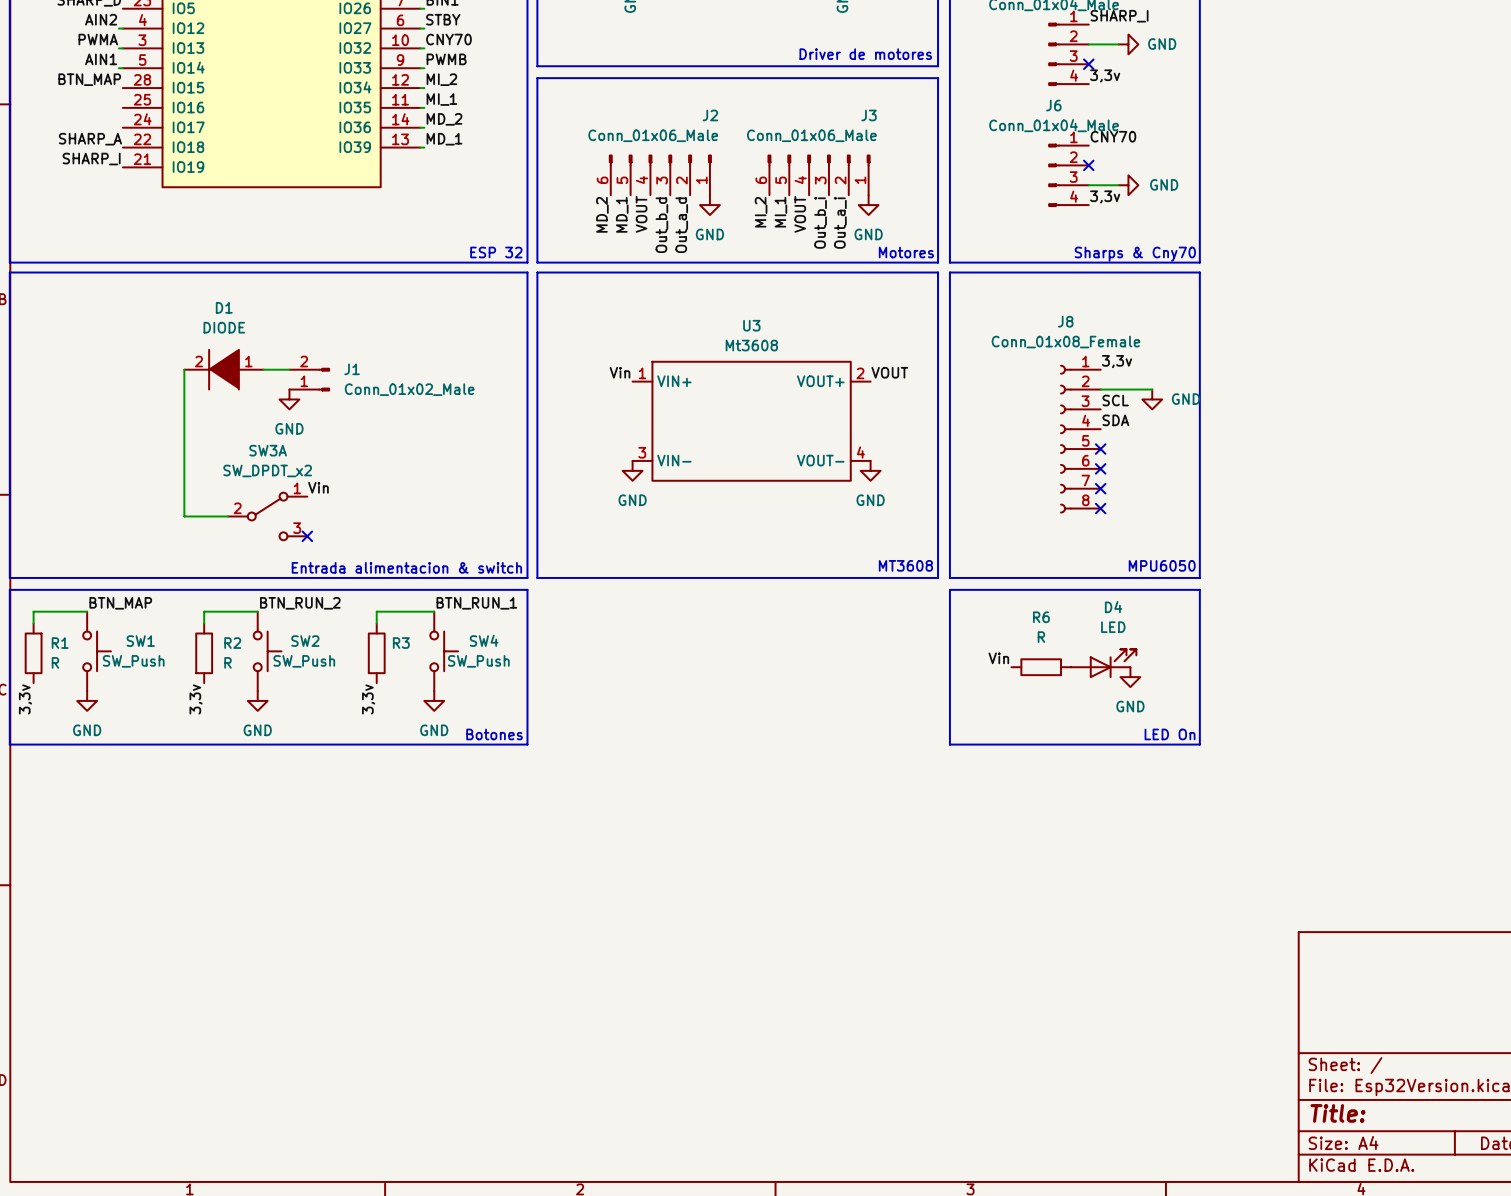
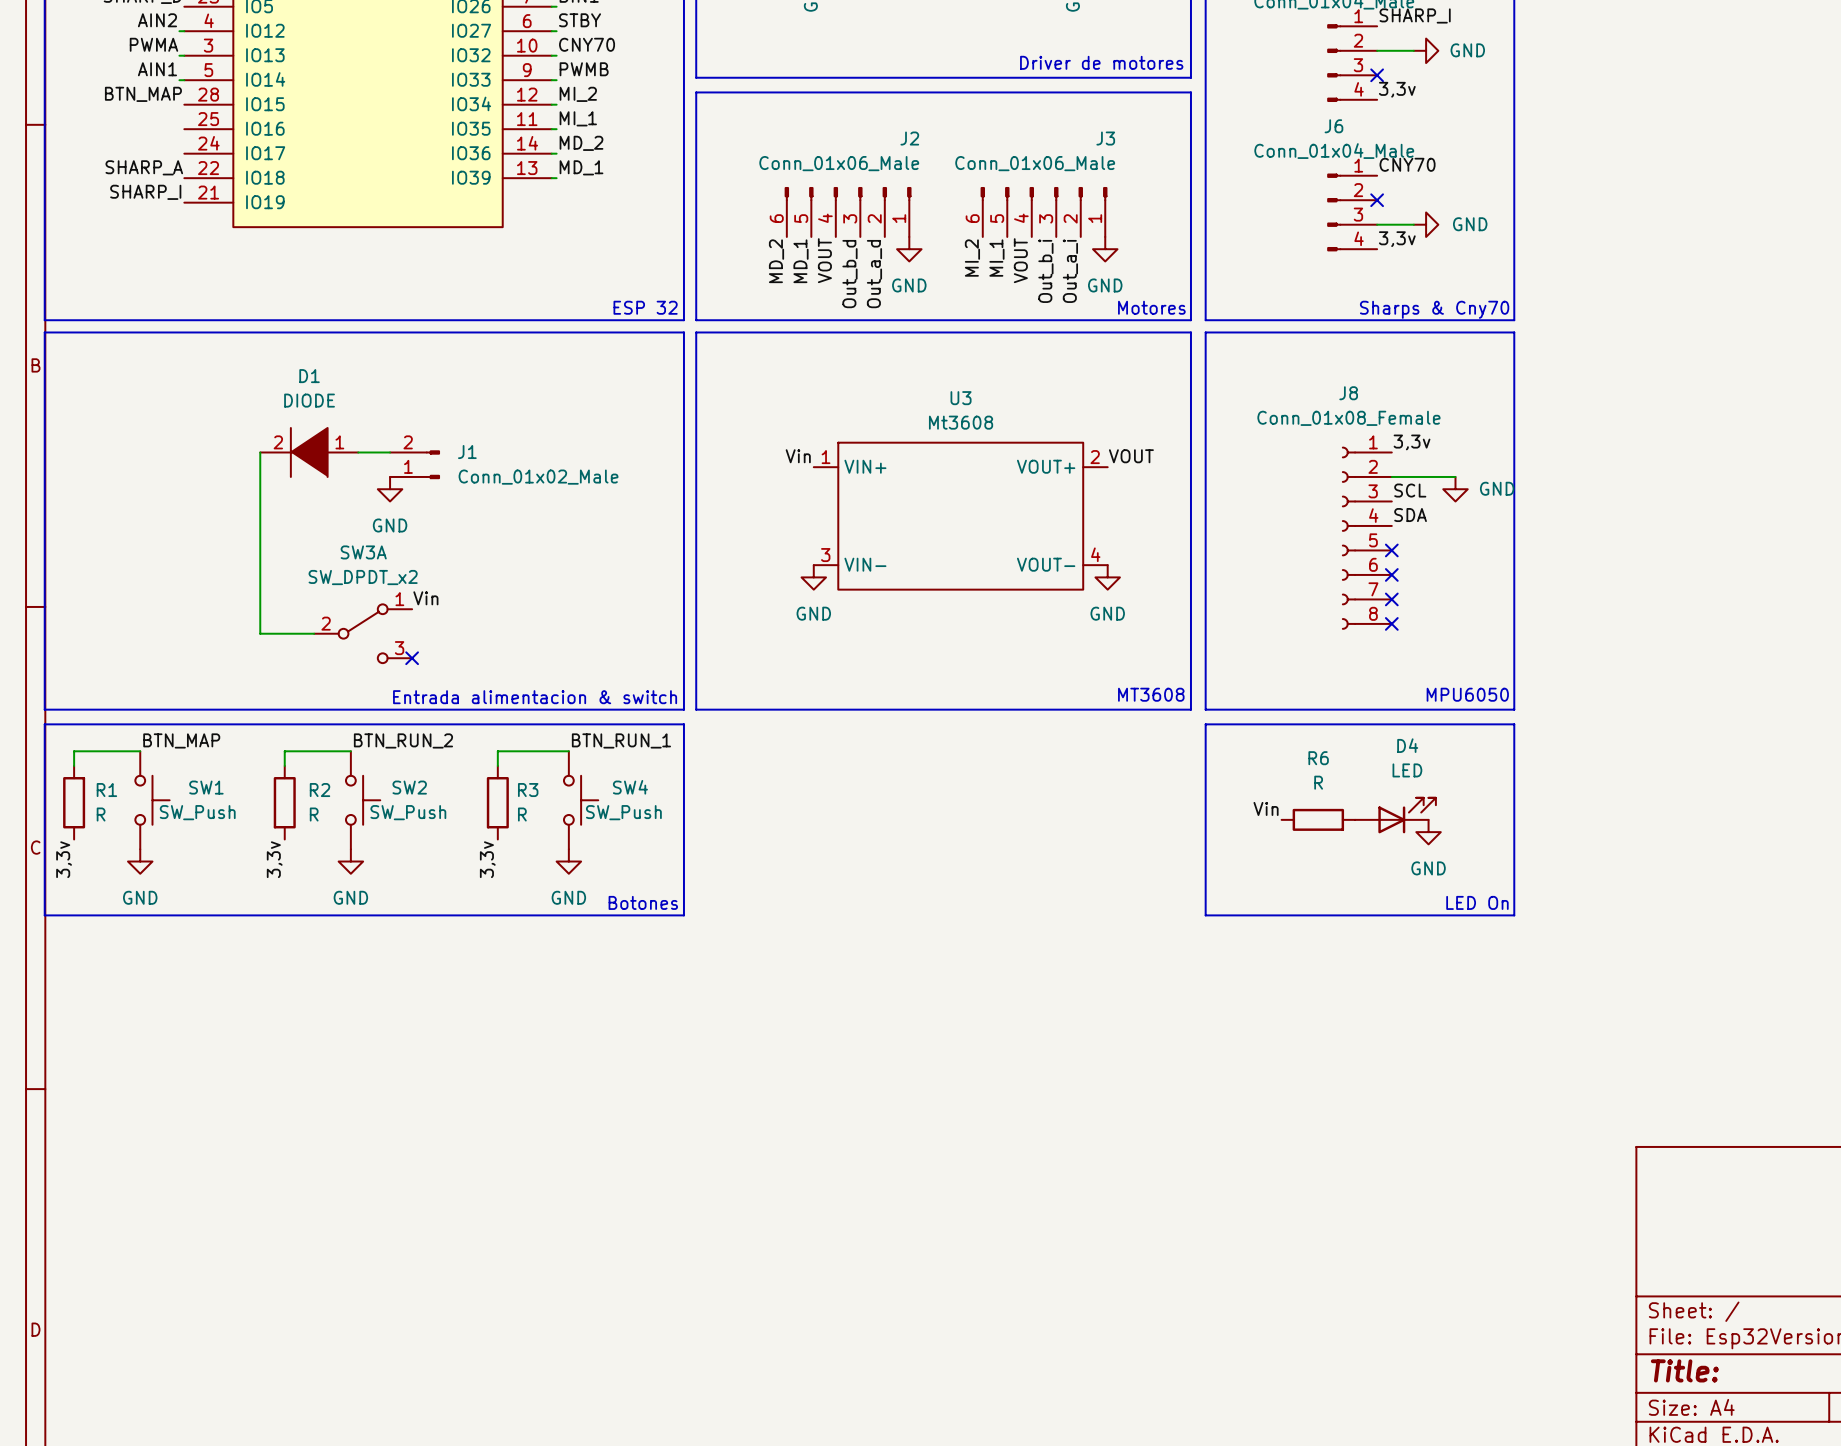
R3 value: none -> R (522, 814)

